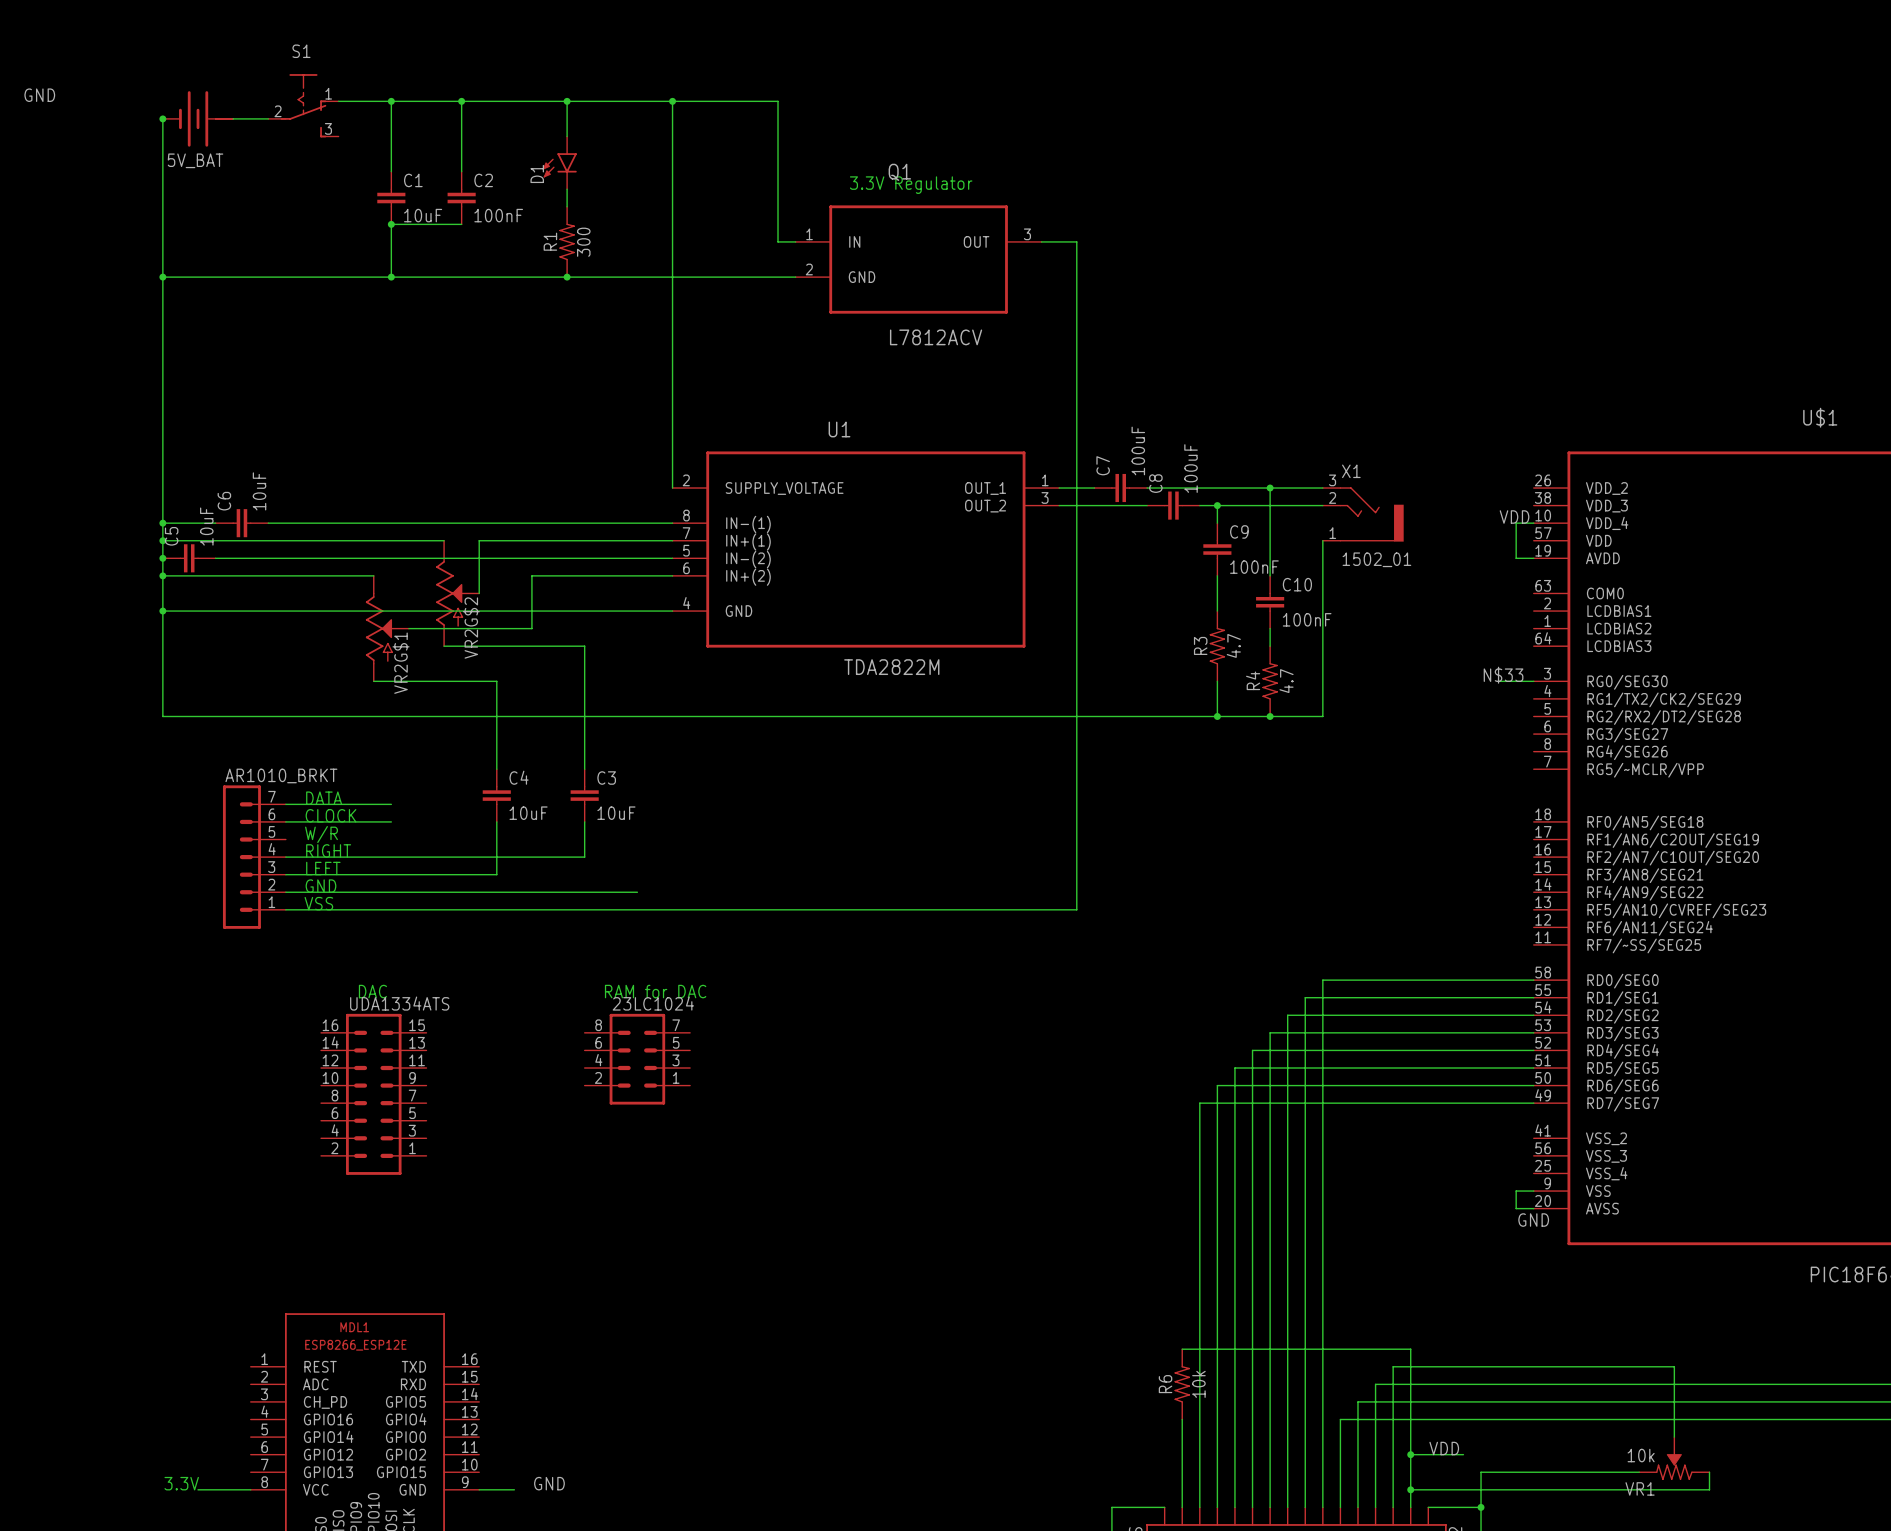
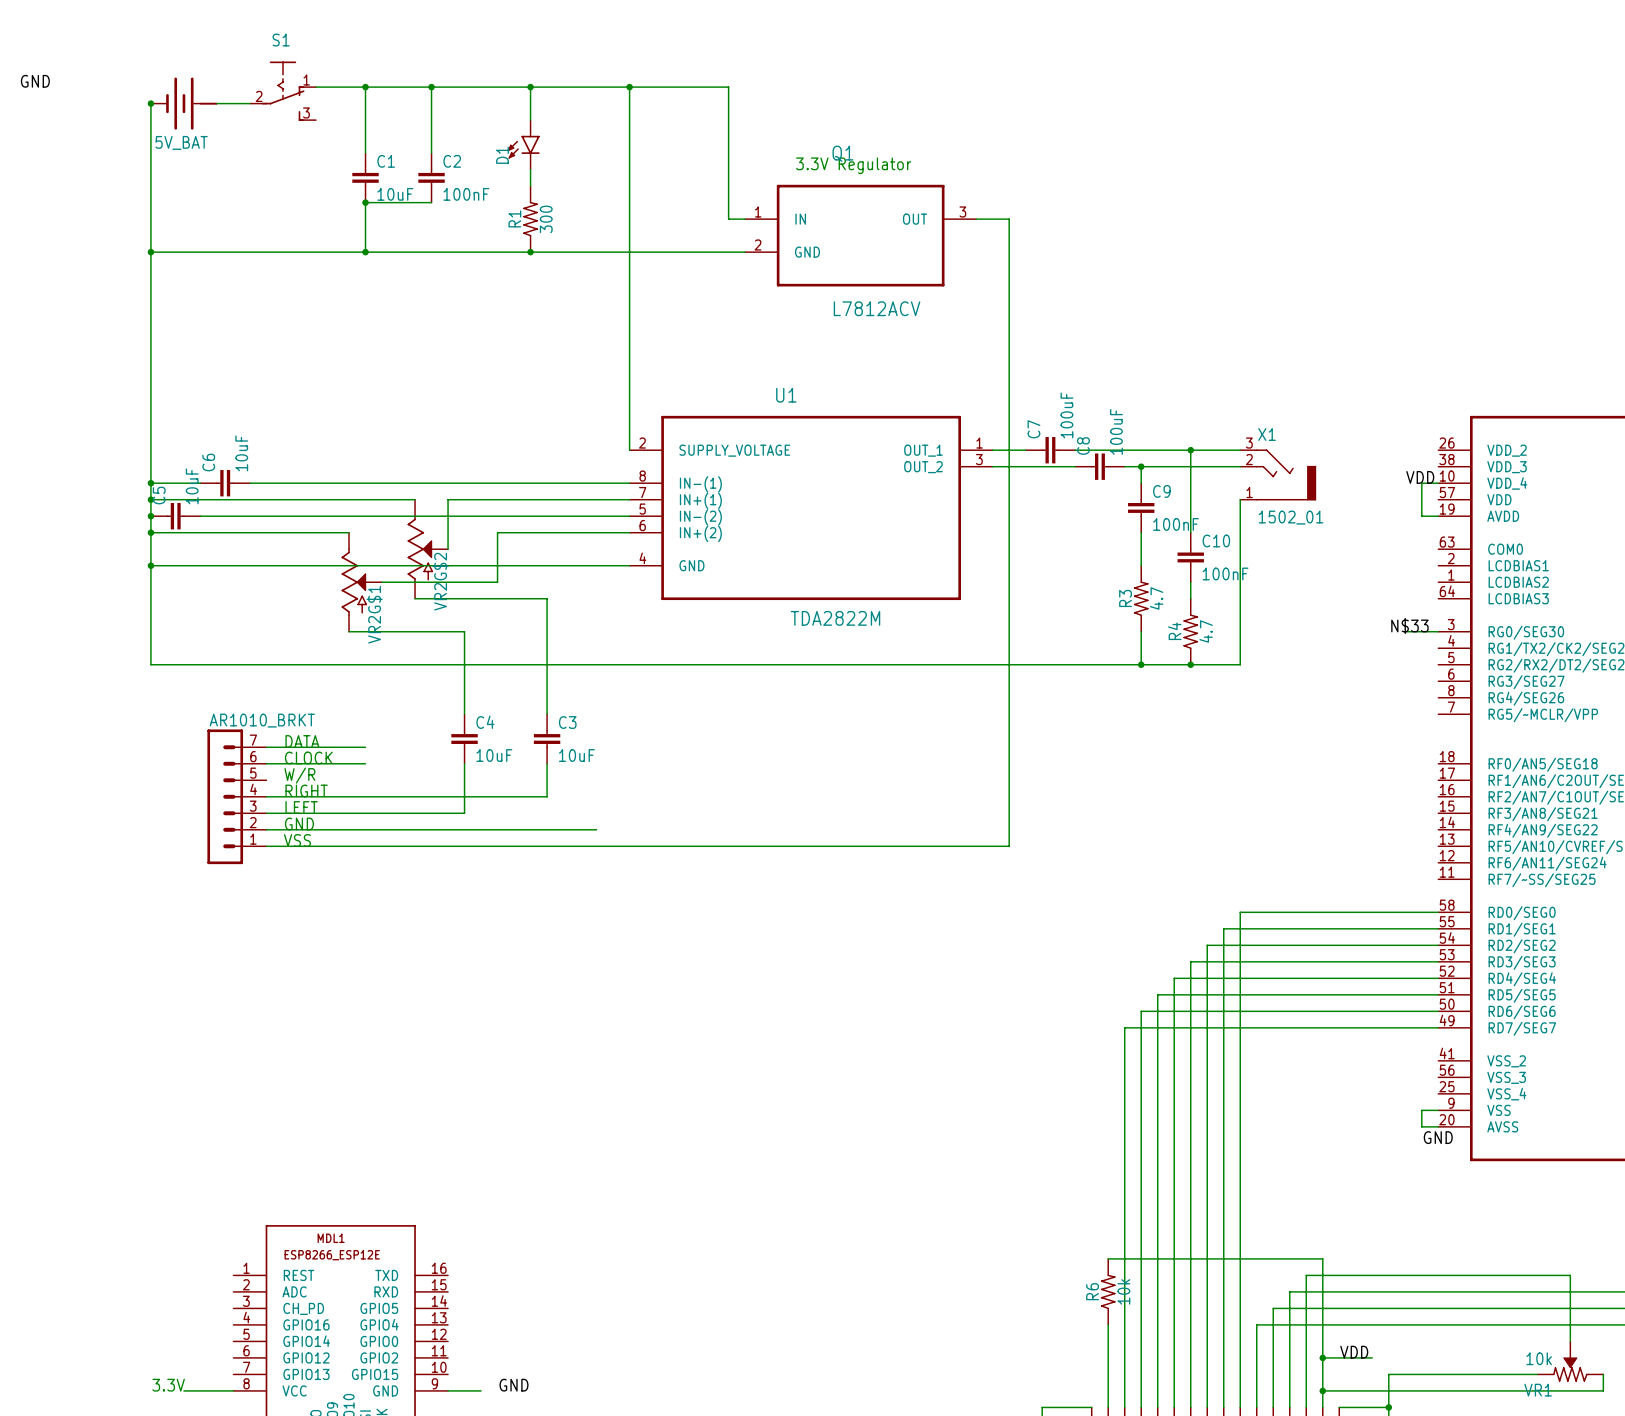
text: DAC (372, 991) -> none
text: RAM for DAC (655, 991) -> none
23LC1024: (637, 1059) -> none
UDA1334ATS: (373, 1094) -> none

